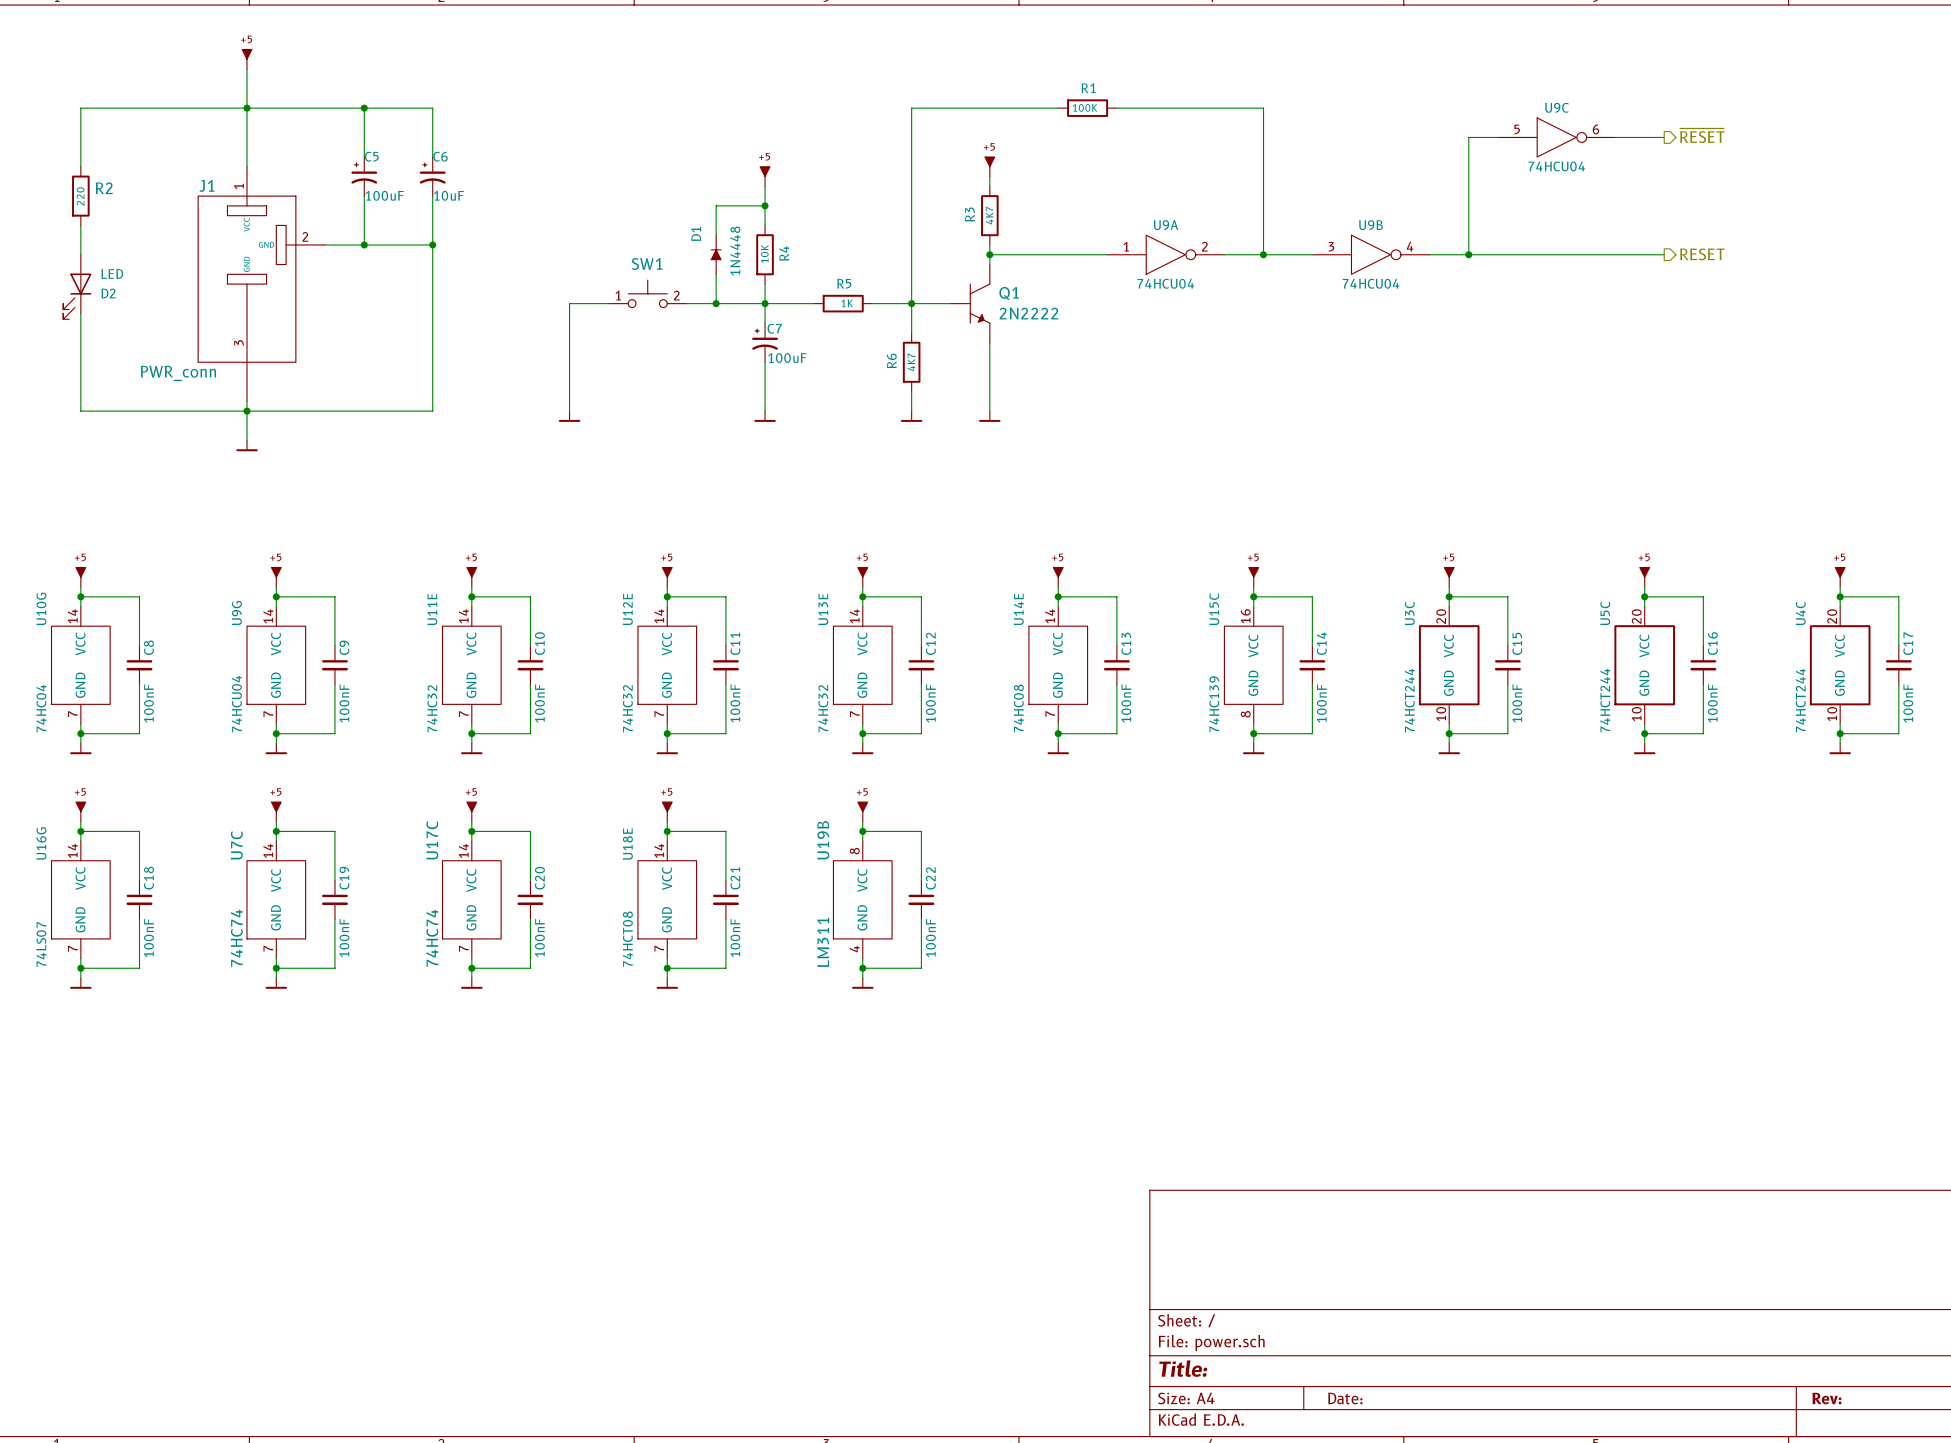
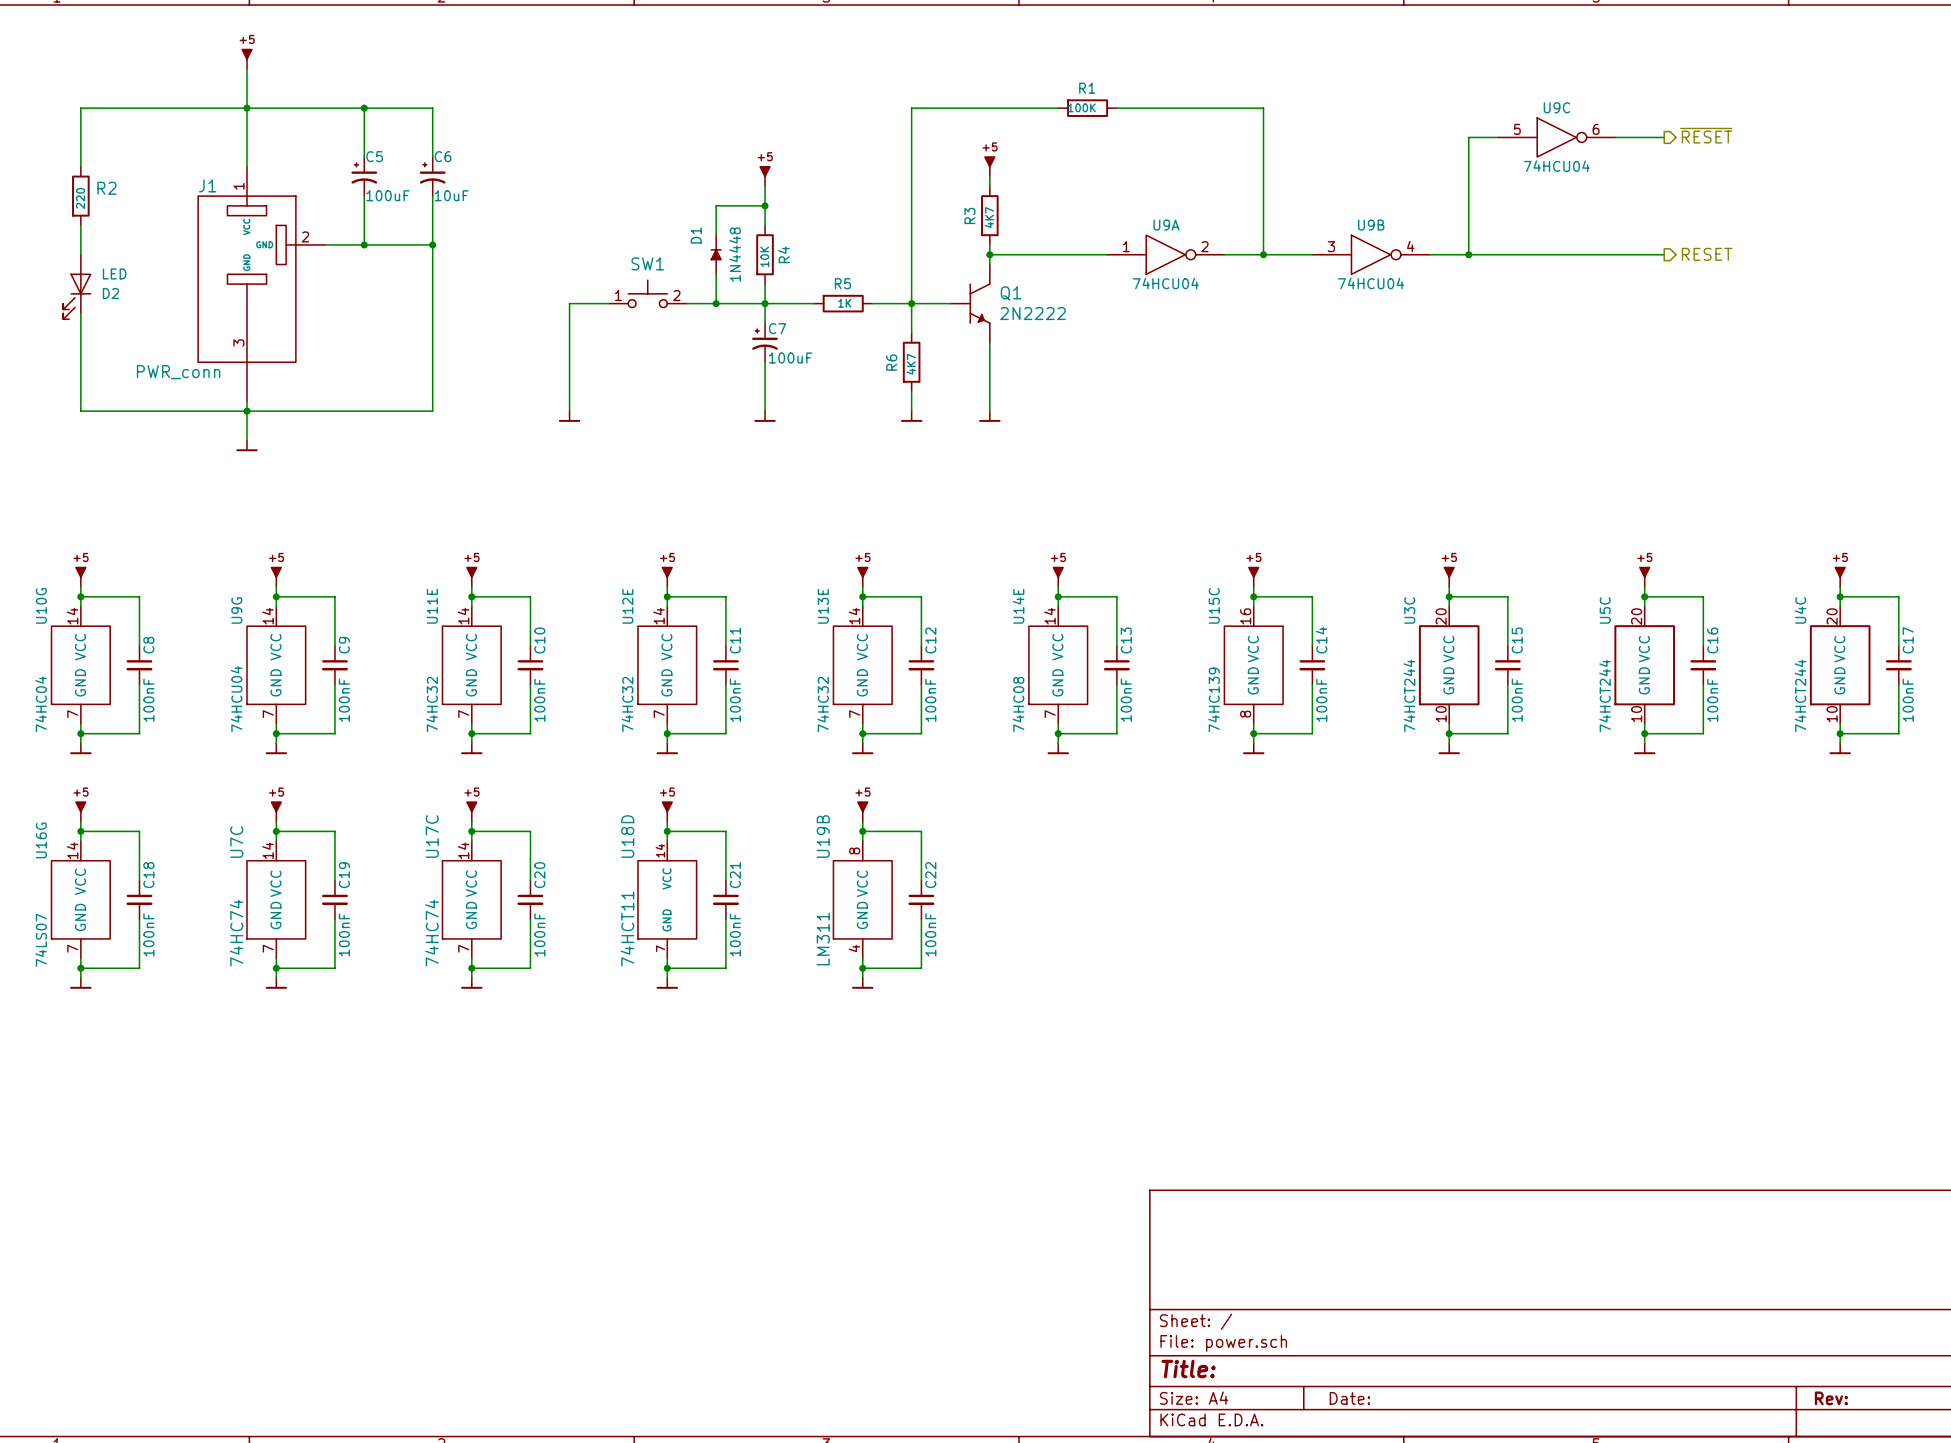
U18E symbol: [637, 841, 697, 959] -> [637, 841, 697, 959]
U18E name: U18E (627, 844) -> U18D (627, 836)
U18E value: 74HCT08 (627, 939) -> 74HCT11 (627, 928)

